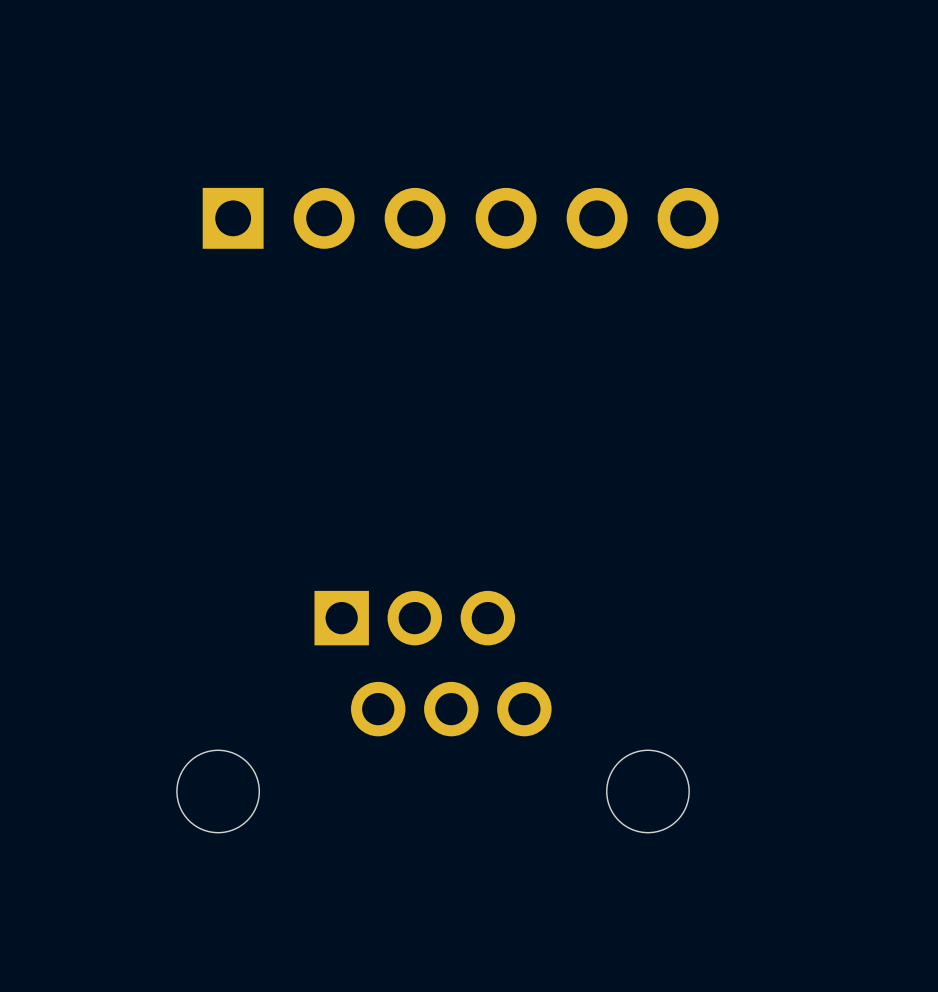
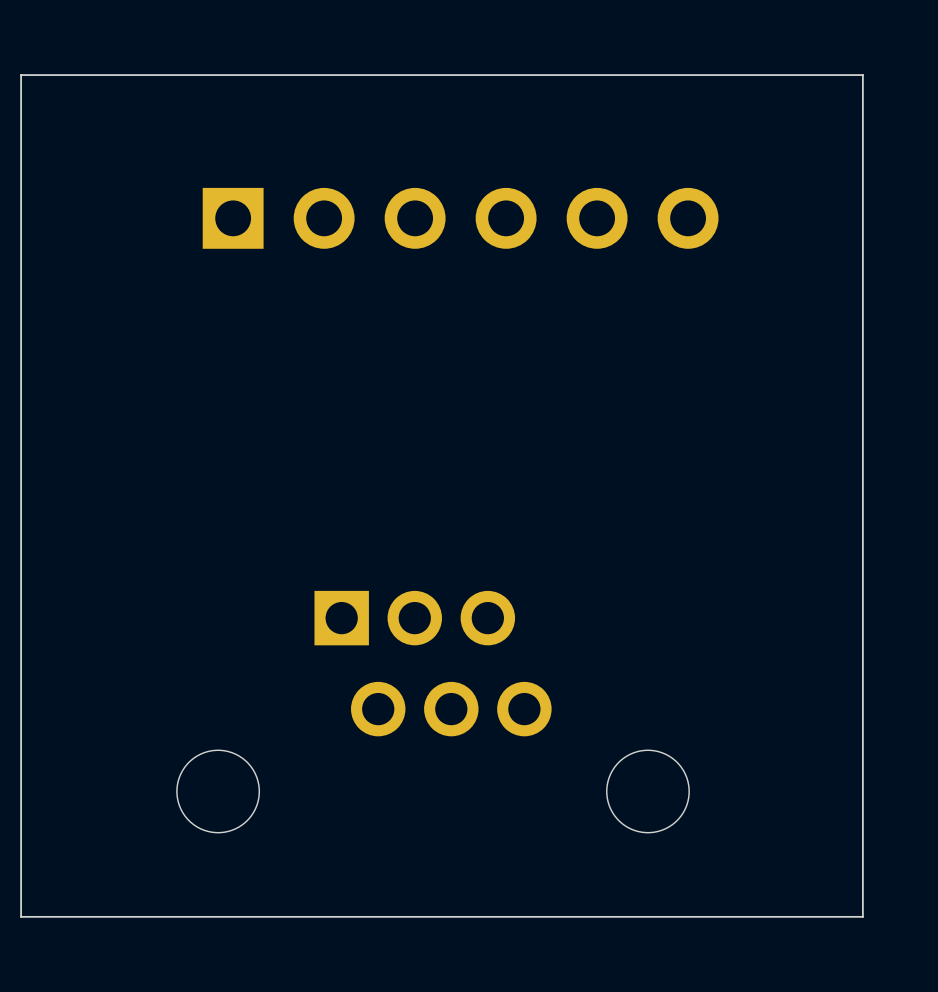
board edge: none -> (862, 75) (21, 75) (21, 916) (862, 916) (862, 75)

